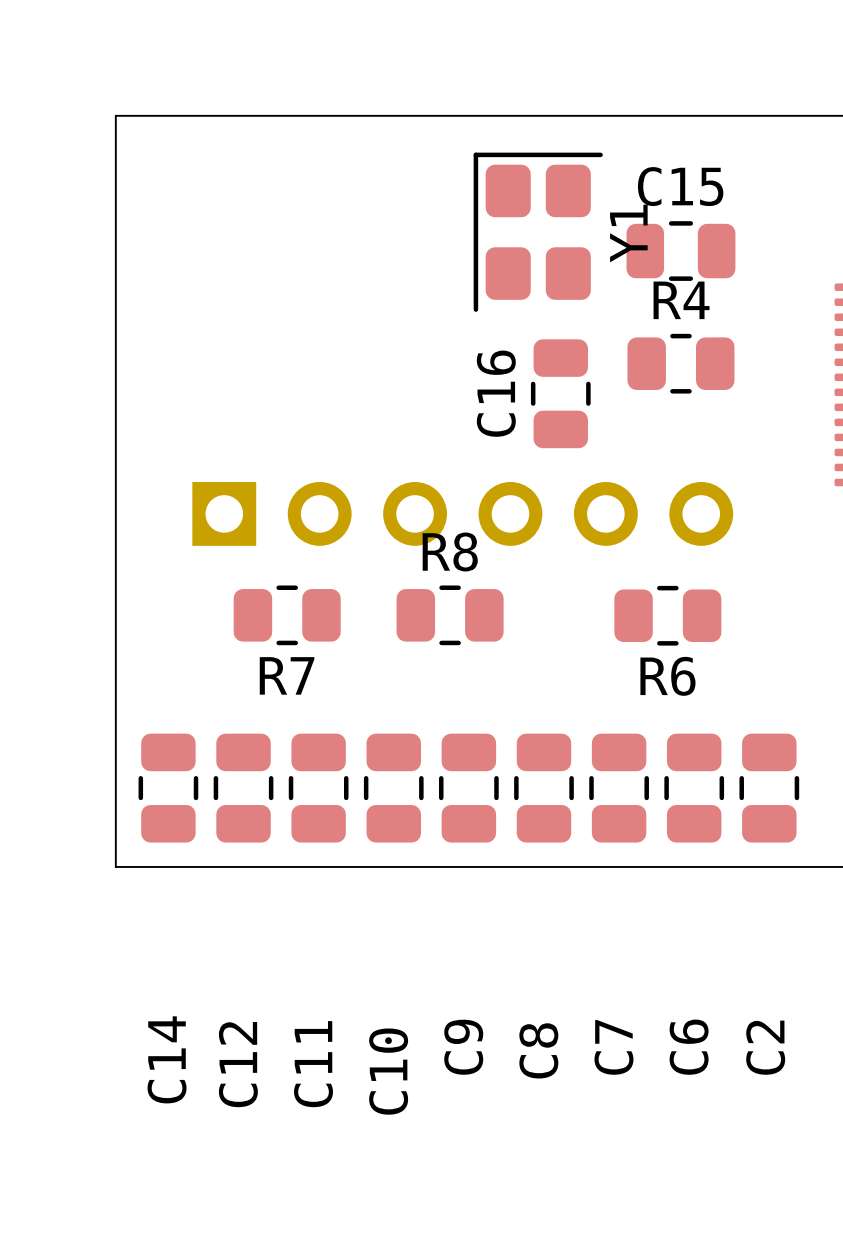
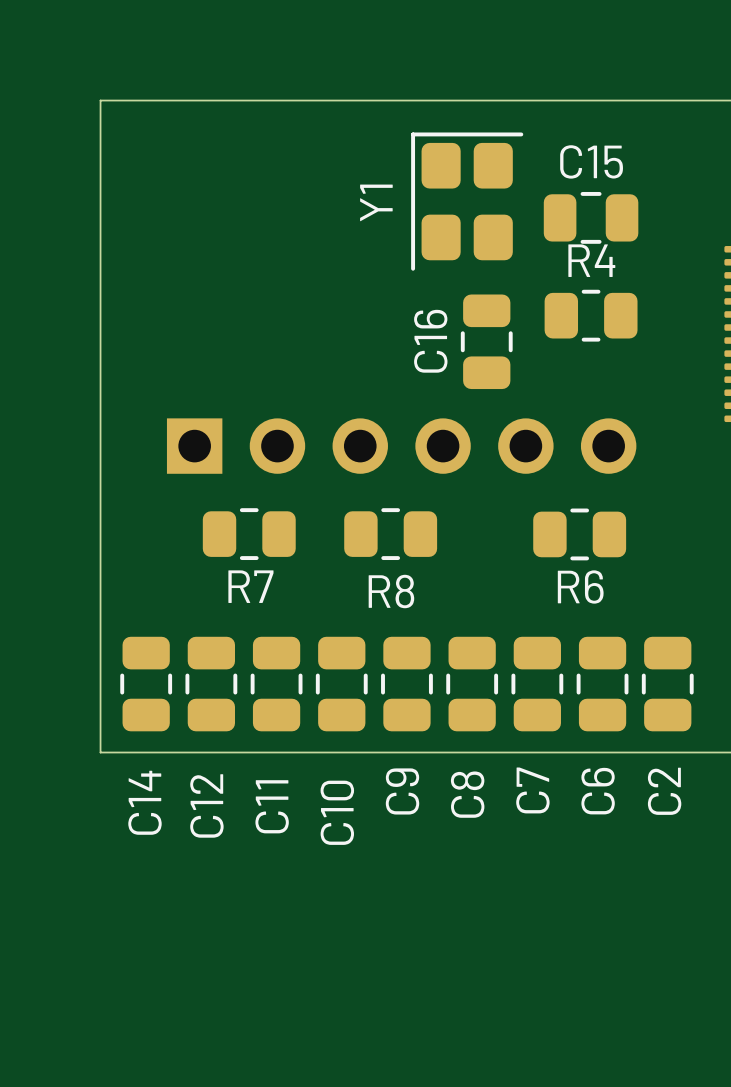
Y1 name position: Y1 (628, 233) -> Y1 (376, 202)
R8 name position: R8 (450, 551) -> R8 (391, 591)
C9 name position: C9 (463, 1047) -> C9 (402, 791)
C7 name position: C7 (613, 1047) -> C7 (532, 790)
C6 name position: C6 (689, 1047) -> C6 (598, 791)
C2 name position: C2 (765, 1047) -> C2 (664, 791)
C8 name position: C8 (538, 1050) -> C8 (467, 794)
C14 name position: C14 (167, 1059) -> C14 (144, 802)
C12 name position: C12 (238, 1064) -> C12 (206, 805)
C11 name position: C11 (313, 1064) -> C11 (272, 806)
C10 name position: C10 (388, 1071) -> C10 (337, 812)

